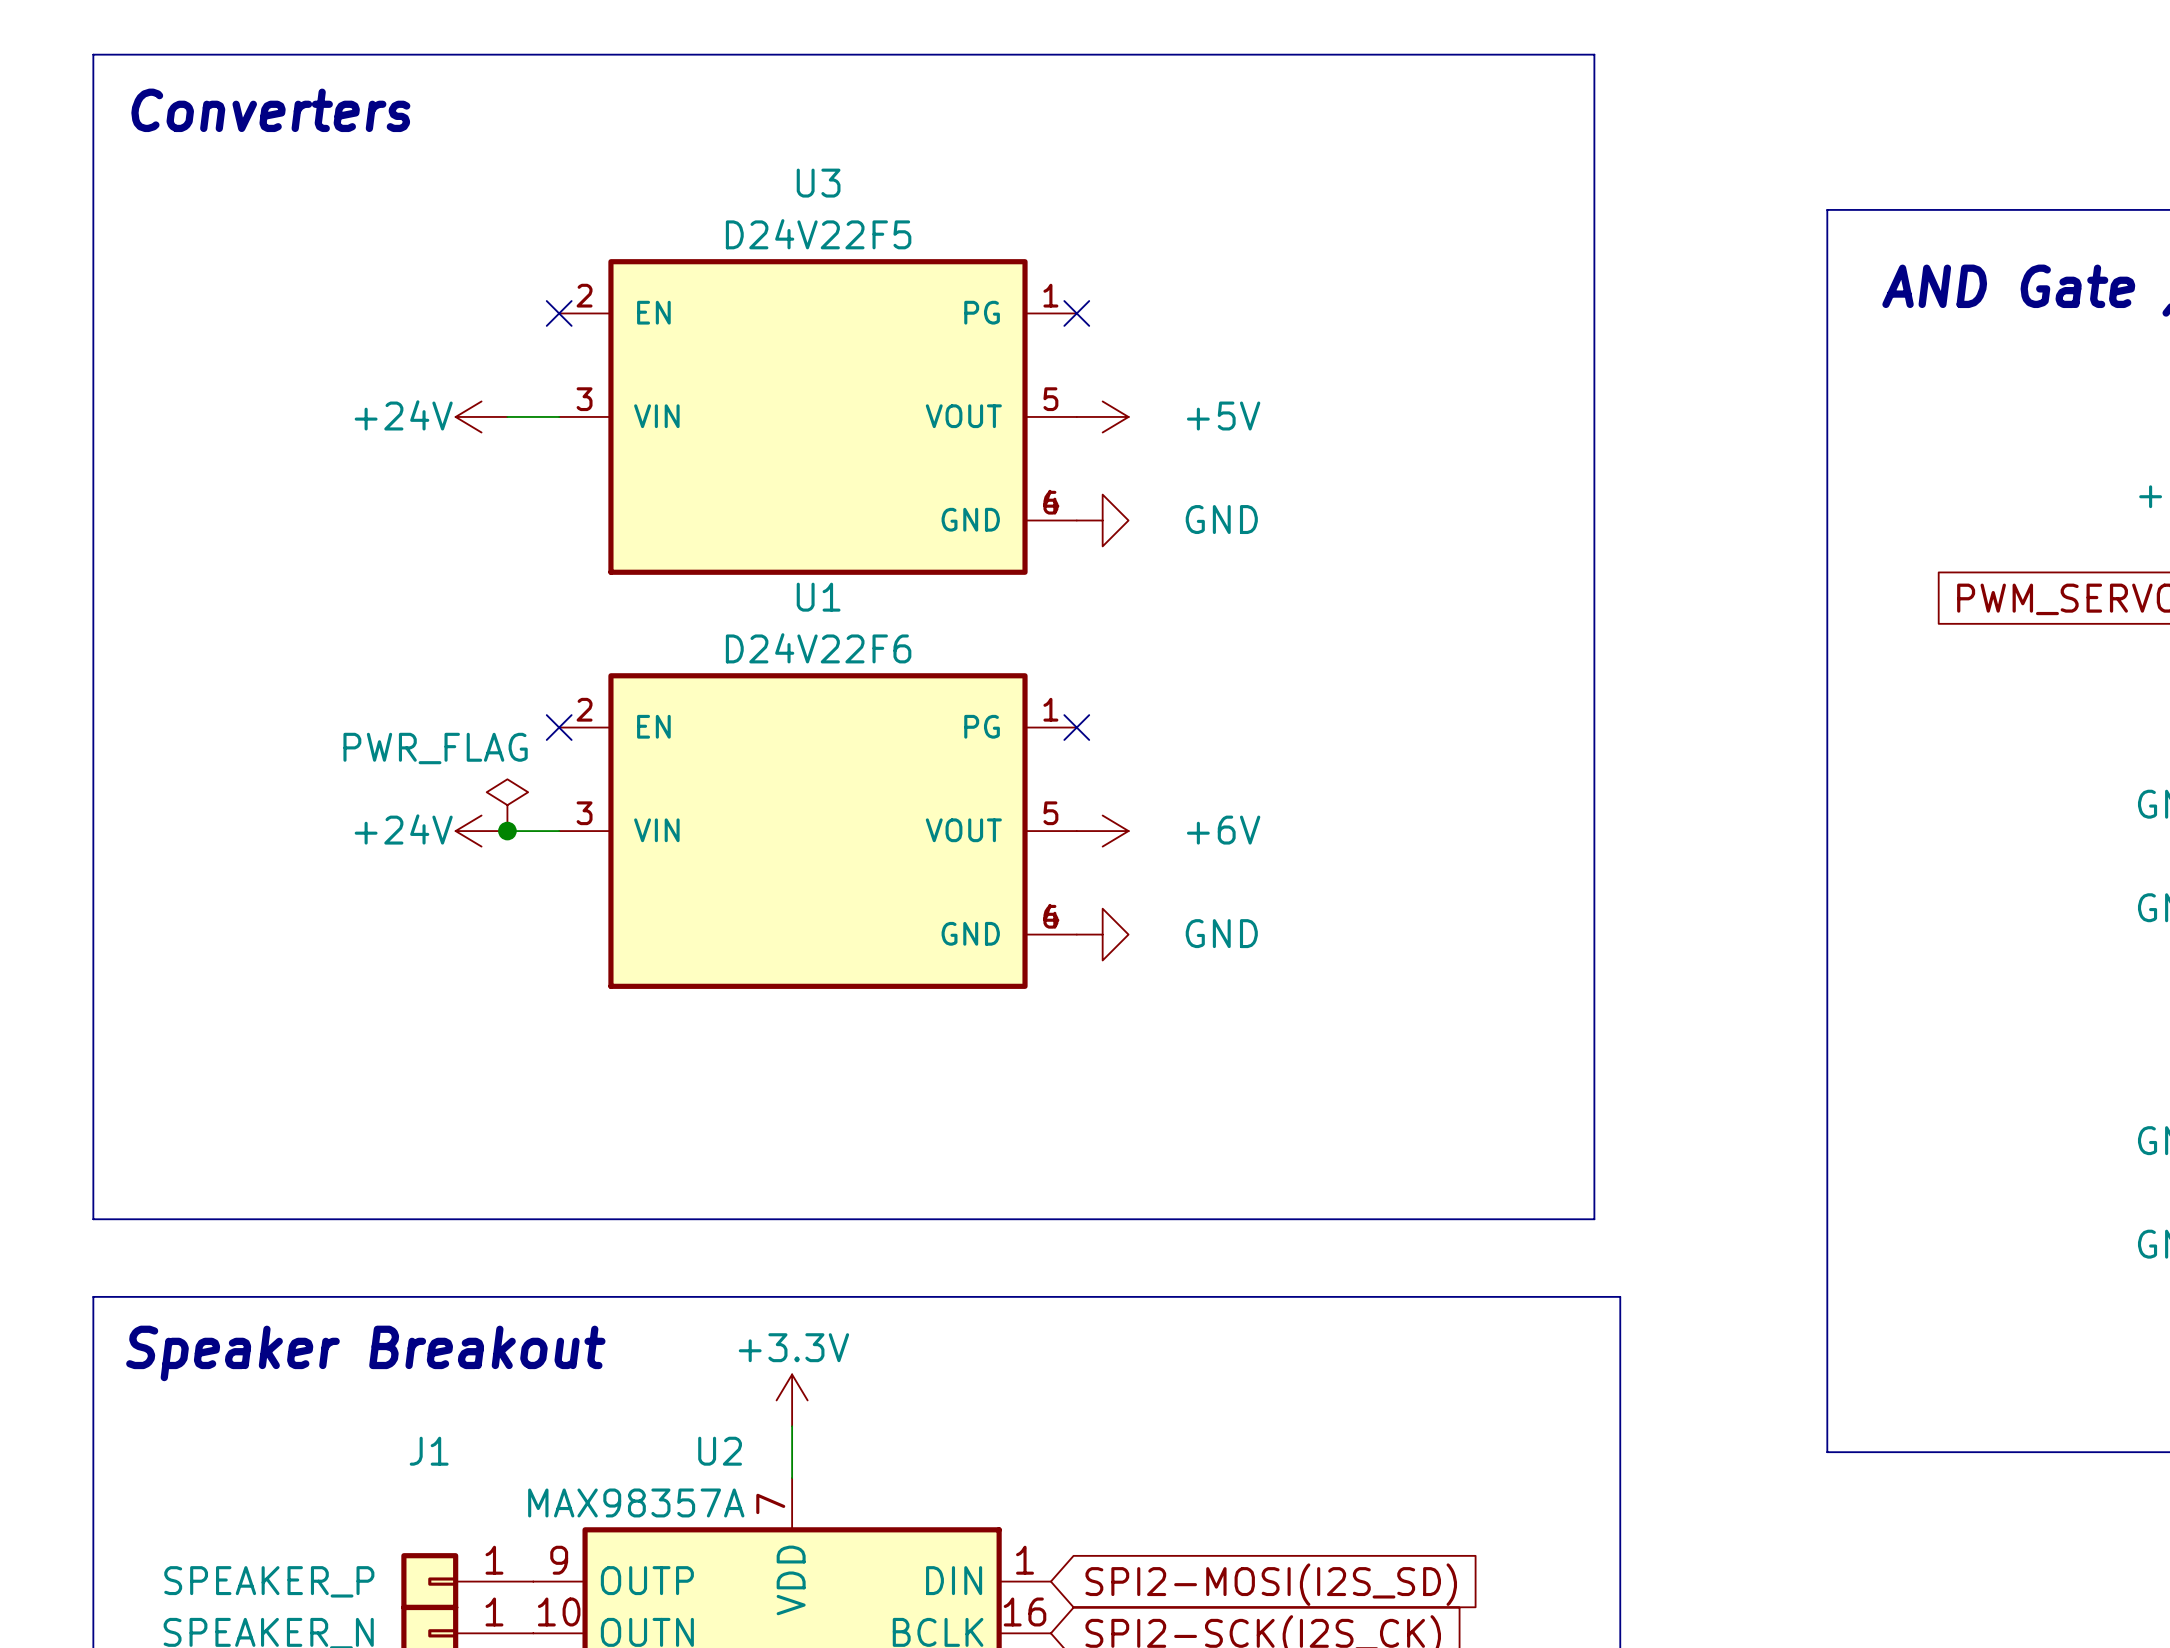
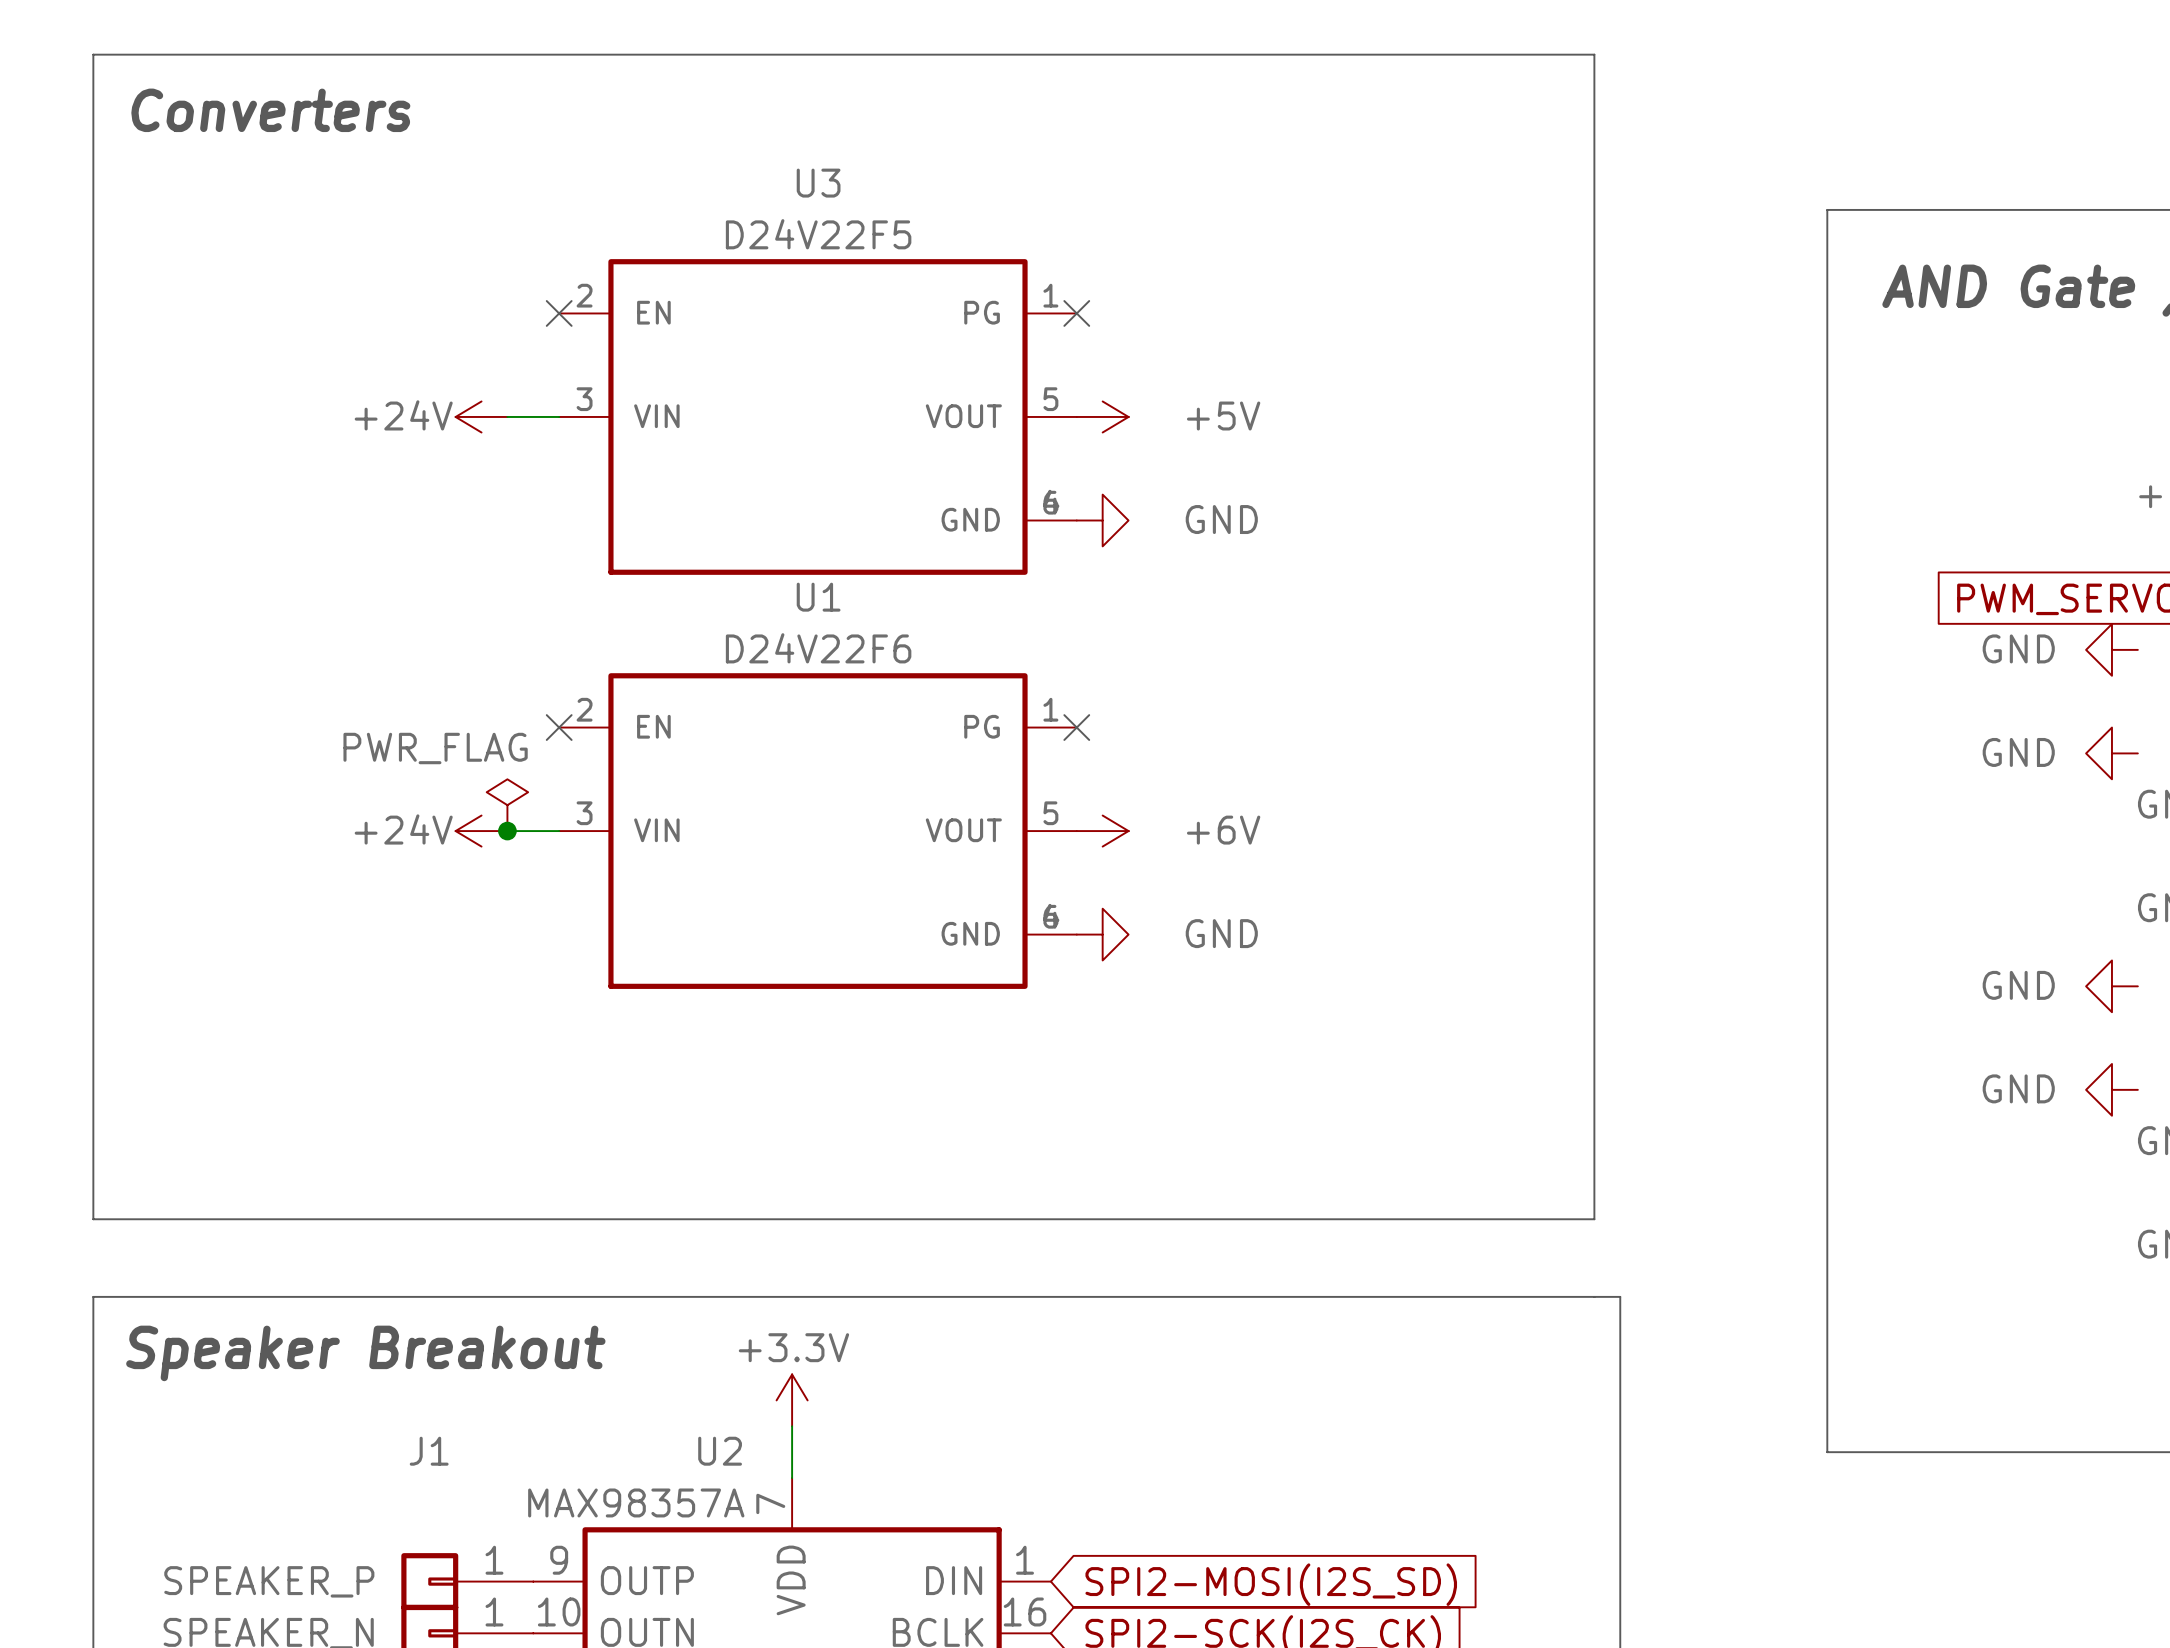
power symbol: none -> GND (2111, 649)
power symbol: none -> GND (2111, 753)
power symbol: none -> GND (2111, 986)
power symbol: none -> GND (2111, 1089)

